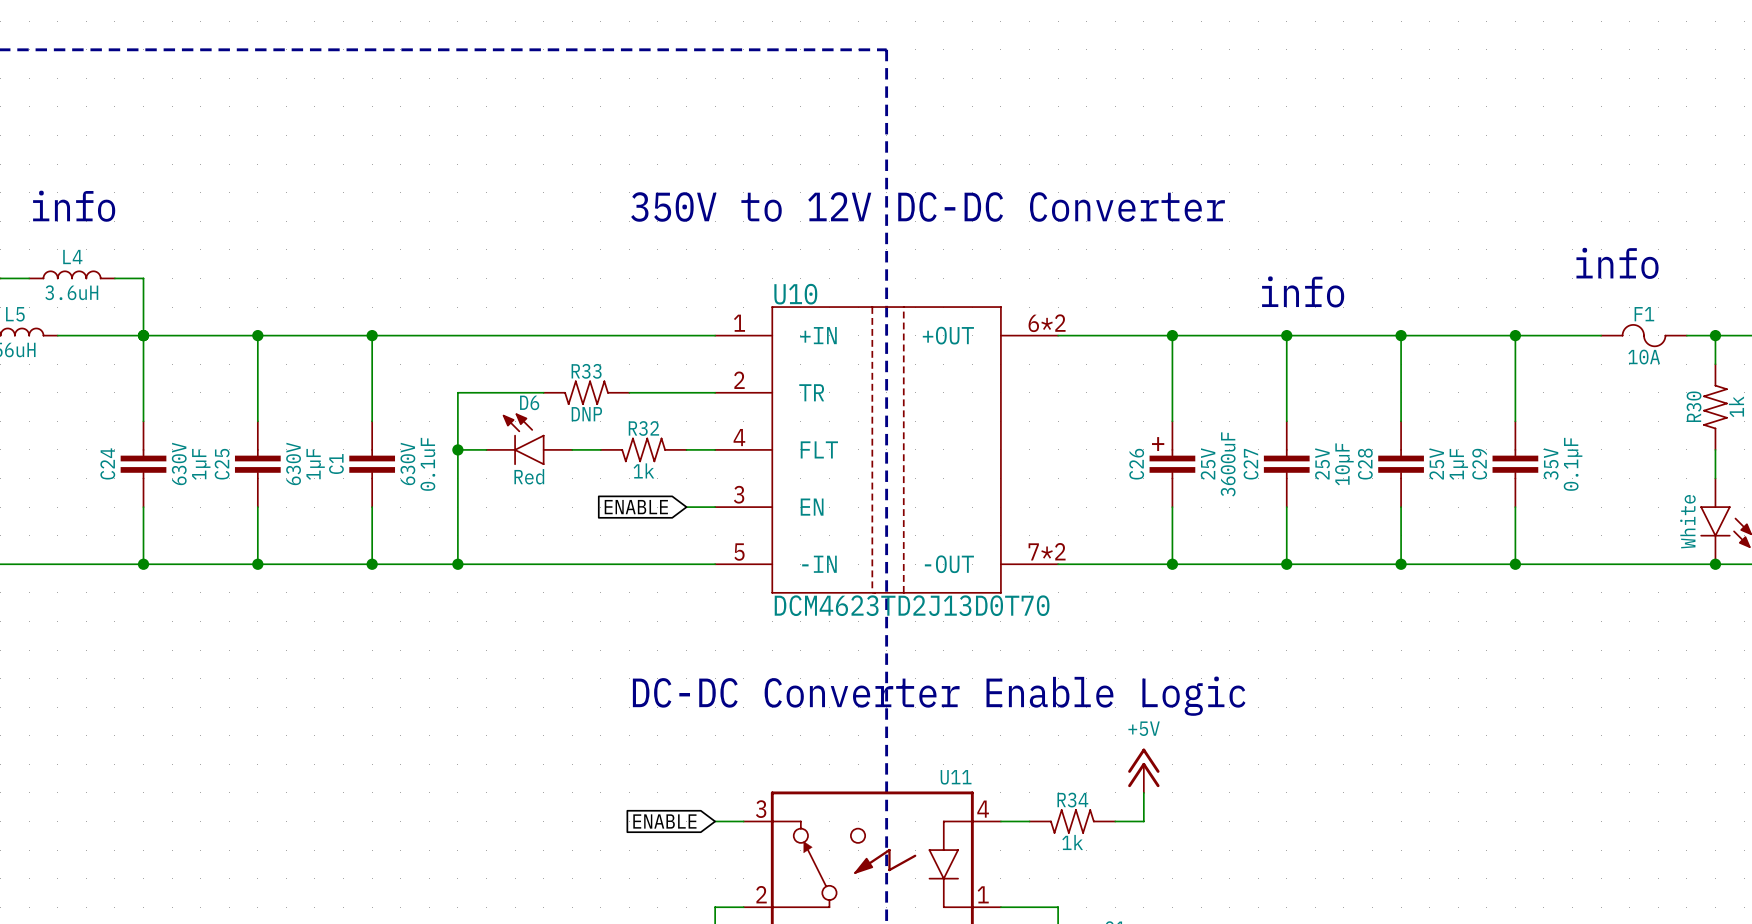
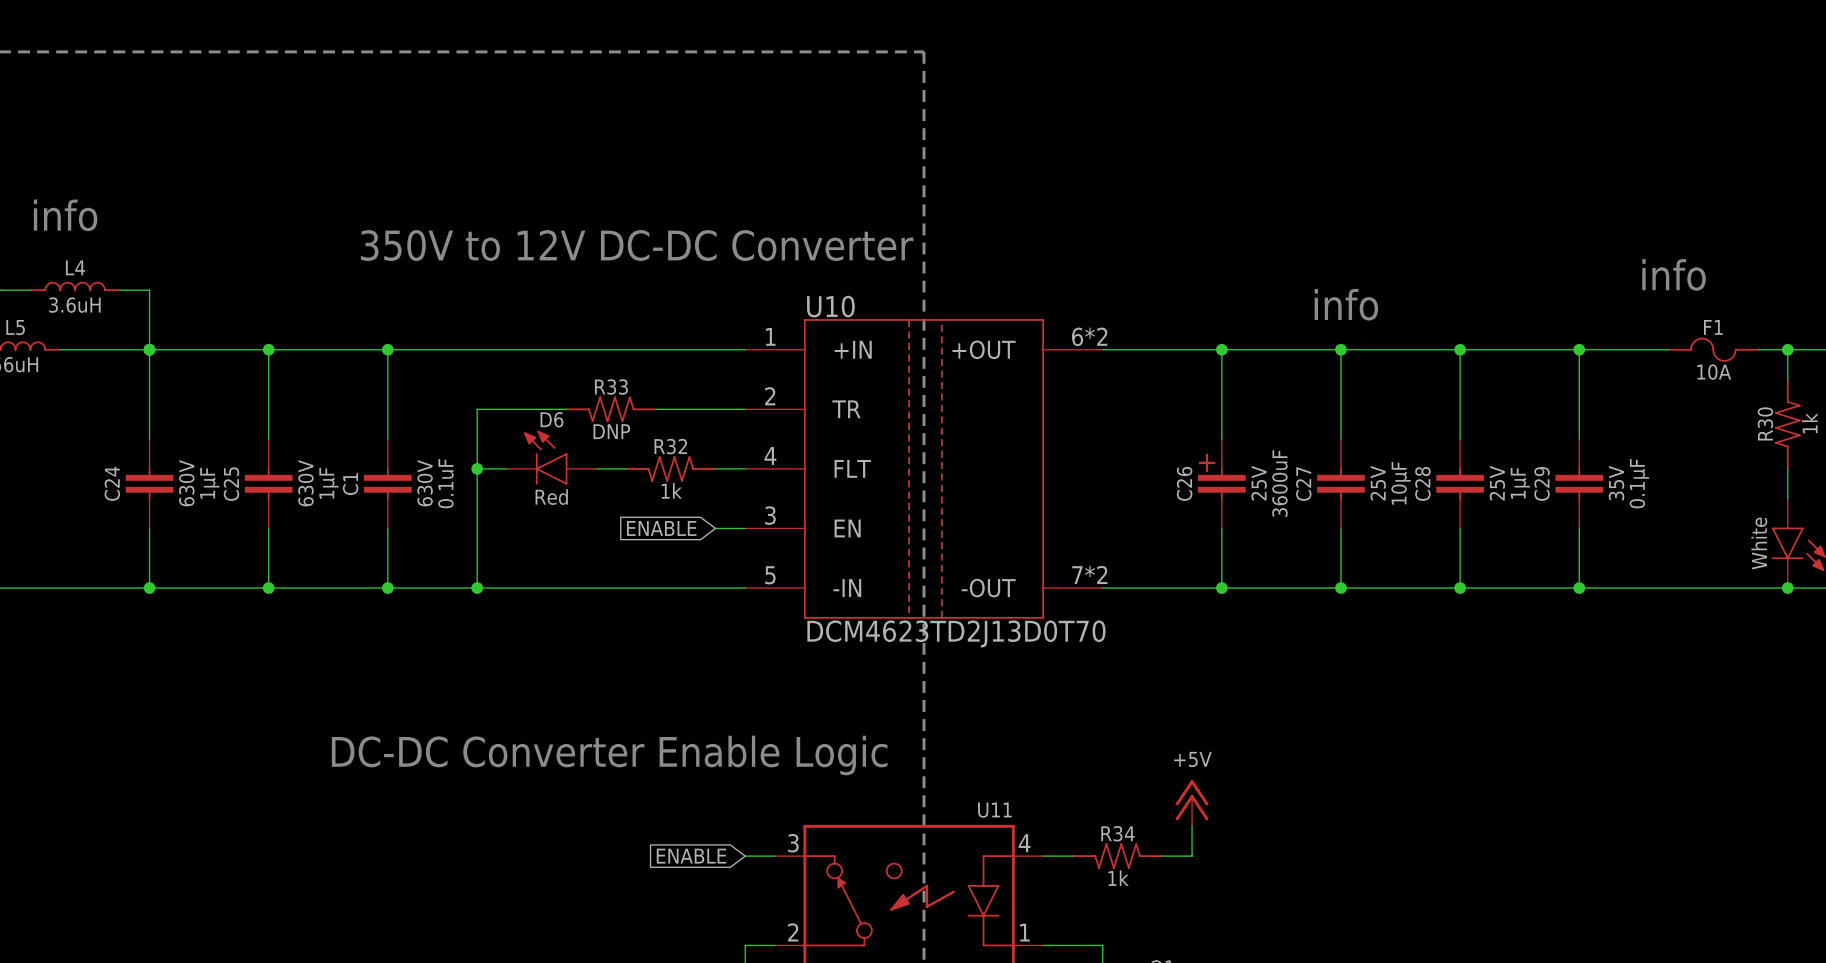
text: 350V to 12V DC-DC Converter (928, 206) -> none
text: none -> 350V to 12V DC-DC Converter (637, 245)
text: DC-DC Converter Enable Logic (939, 696) -> none
text: none -> DC-DC Converter Enable Logic (609, 755)

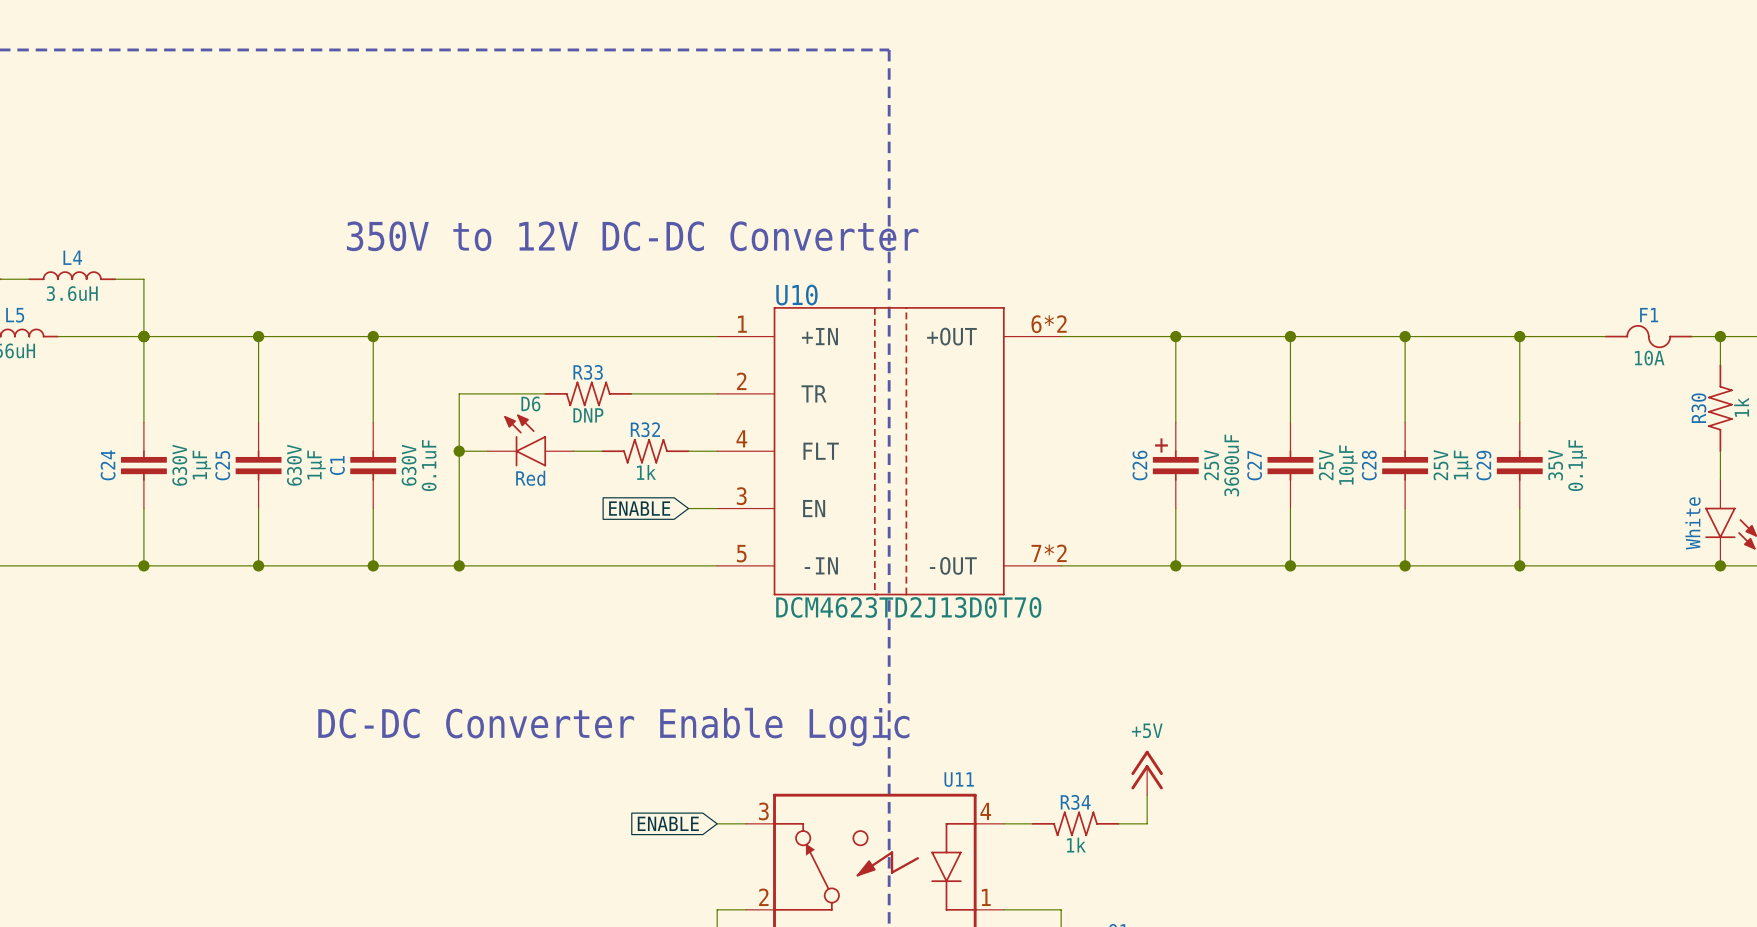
text: info (65, 215) -> none
text: info (1674, 274) -> none
text: info (1346, 304) -> none

